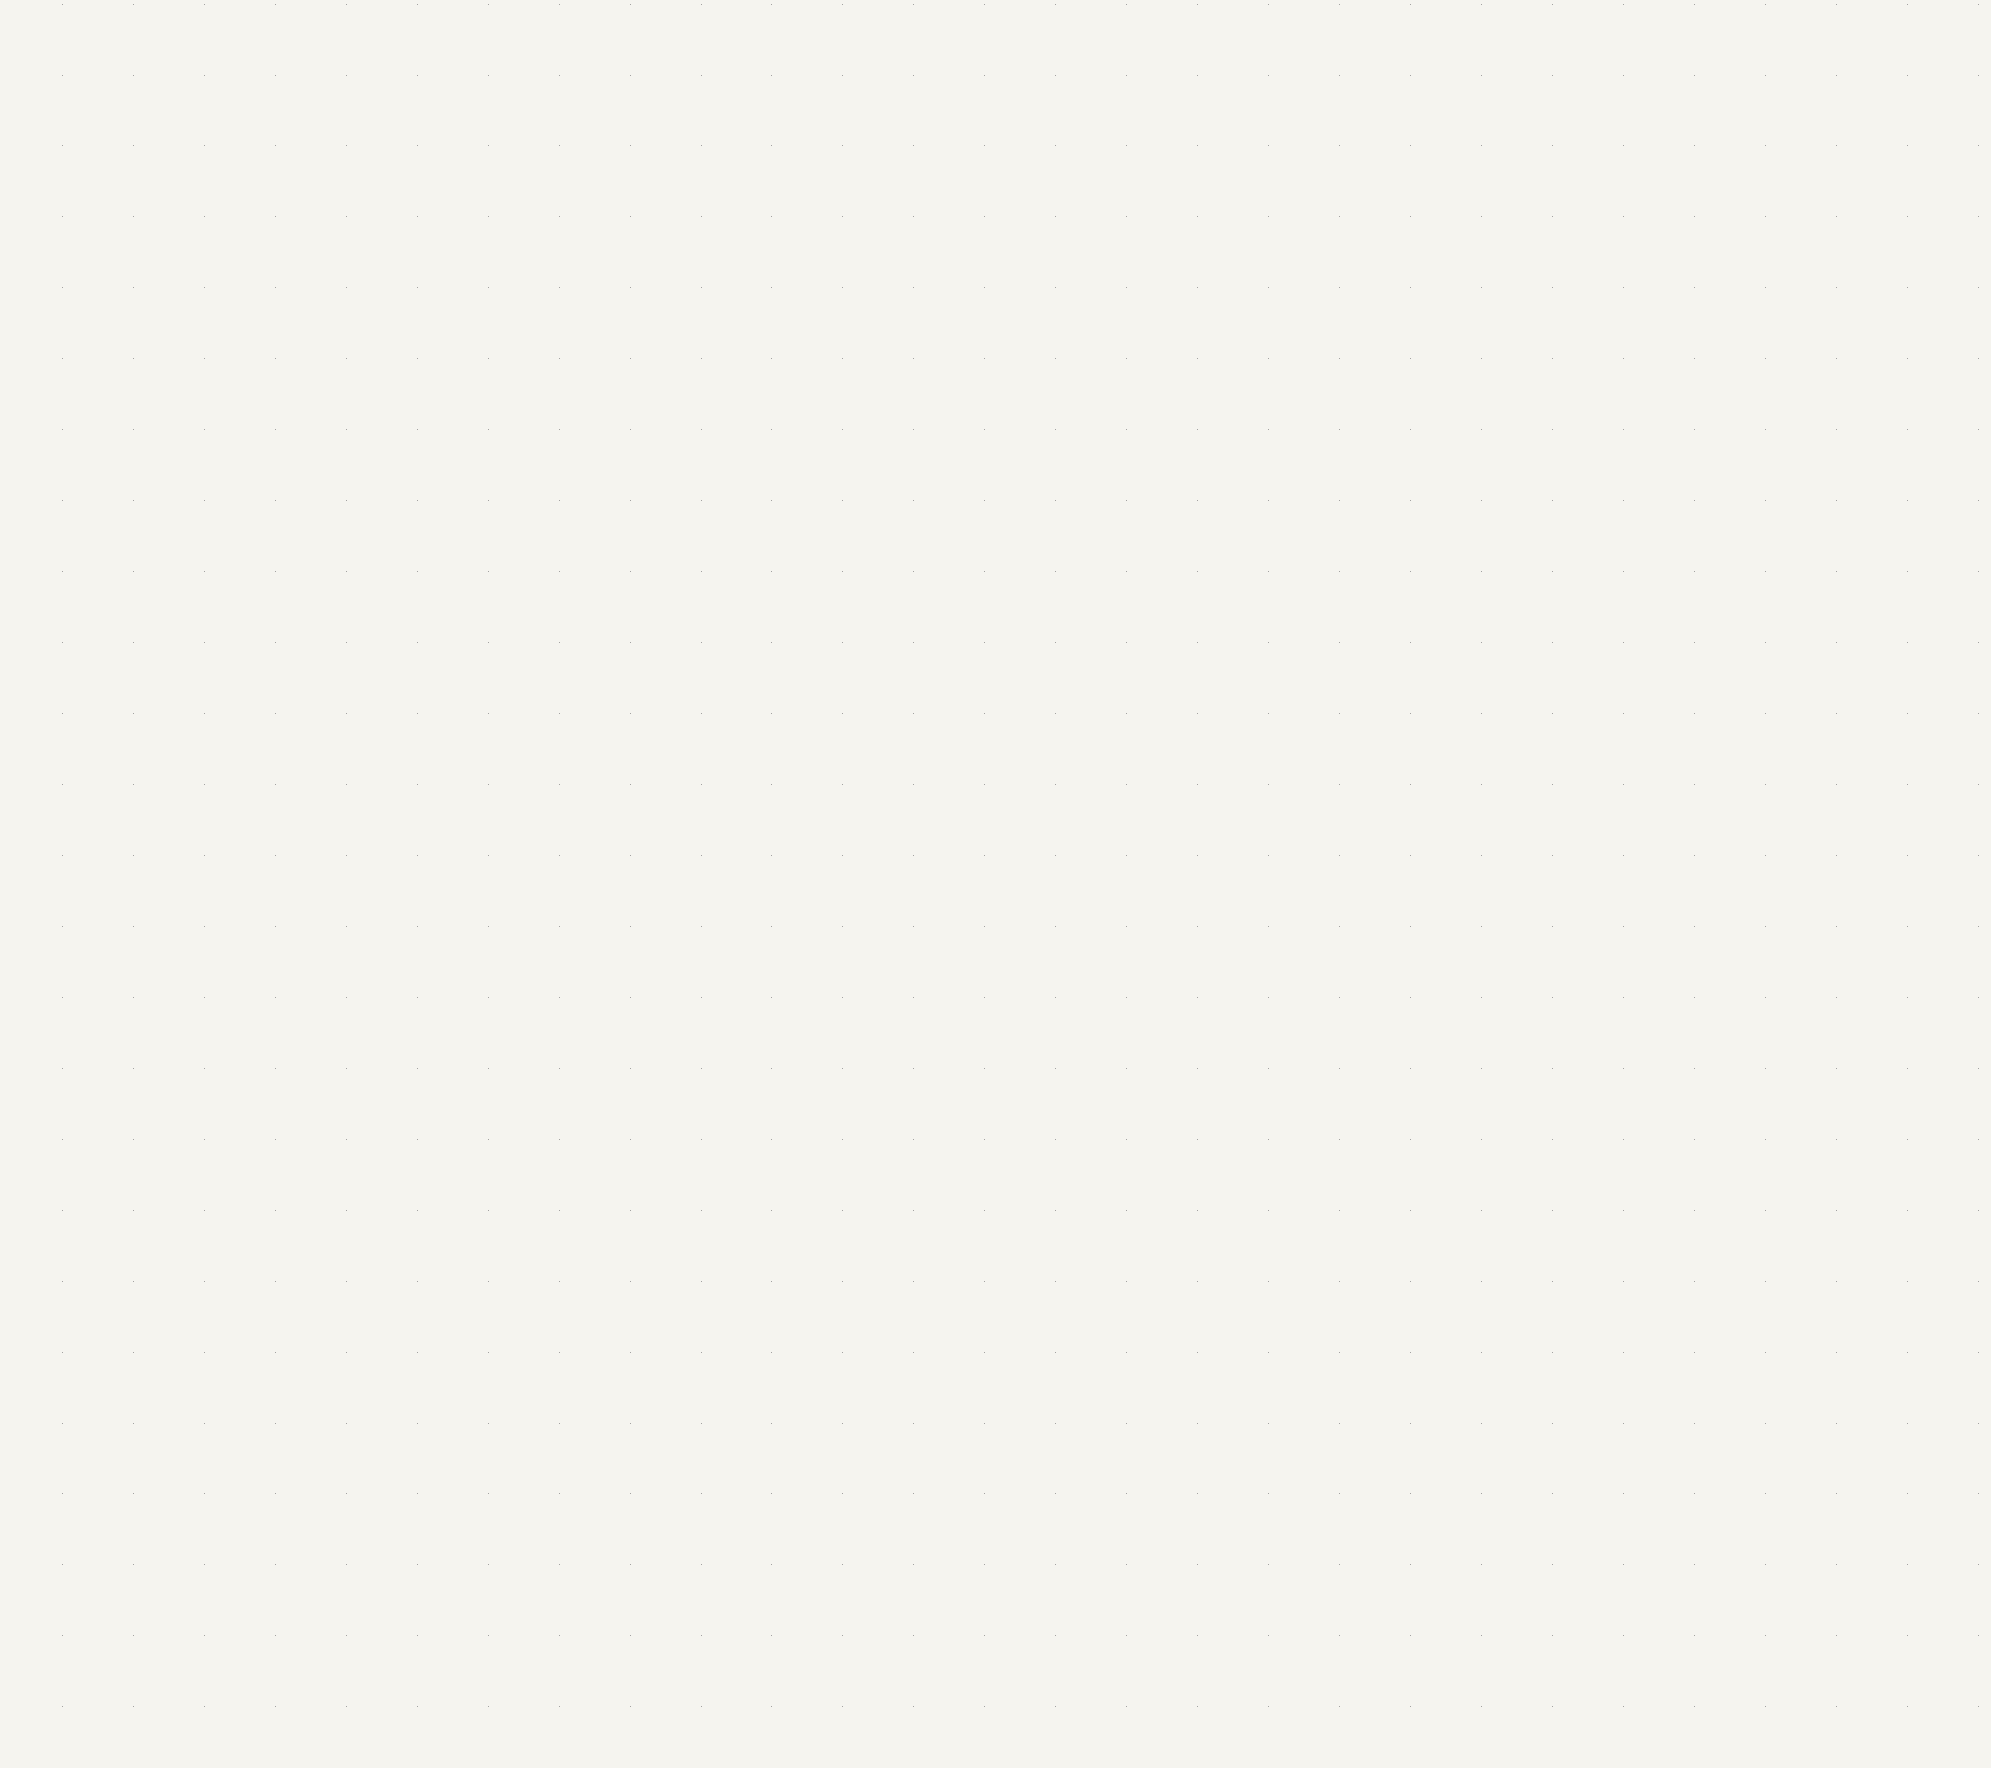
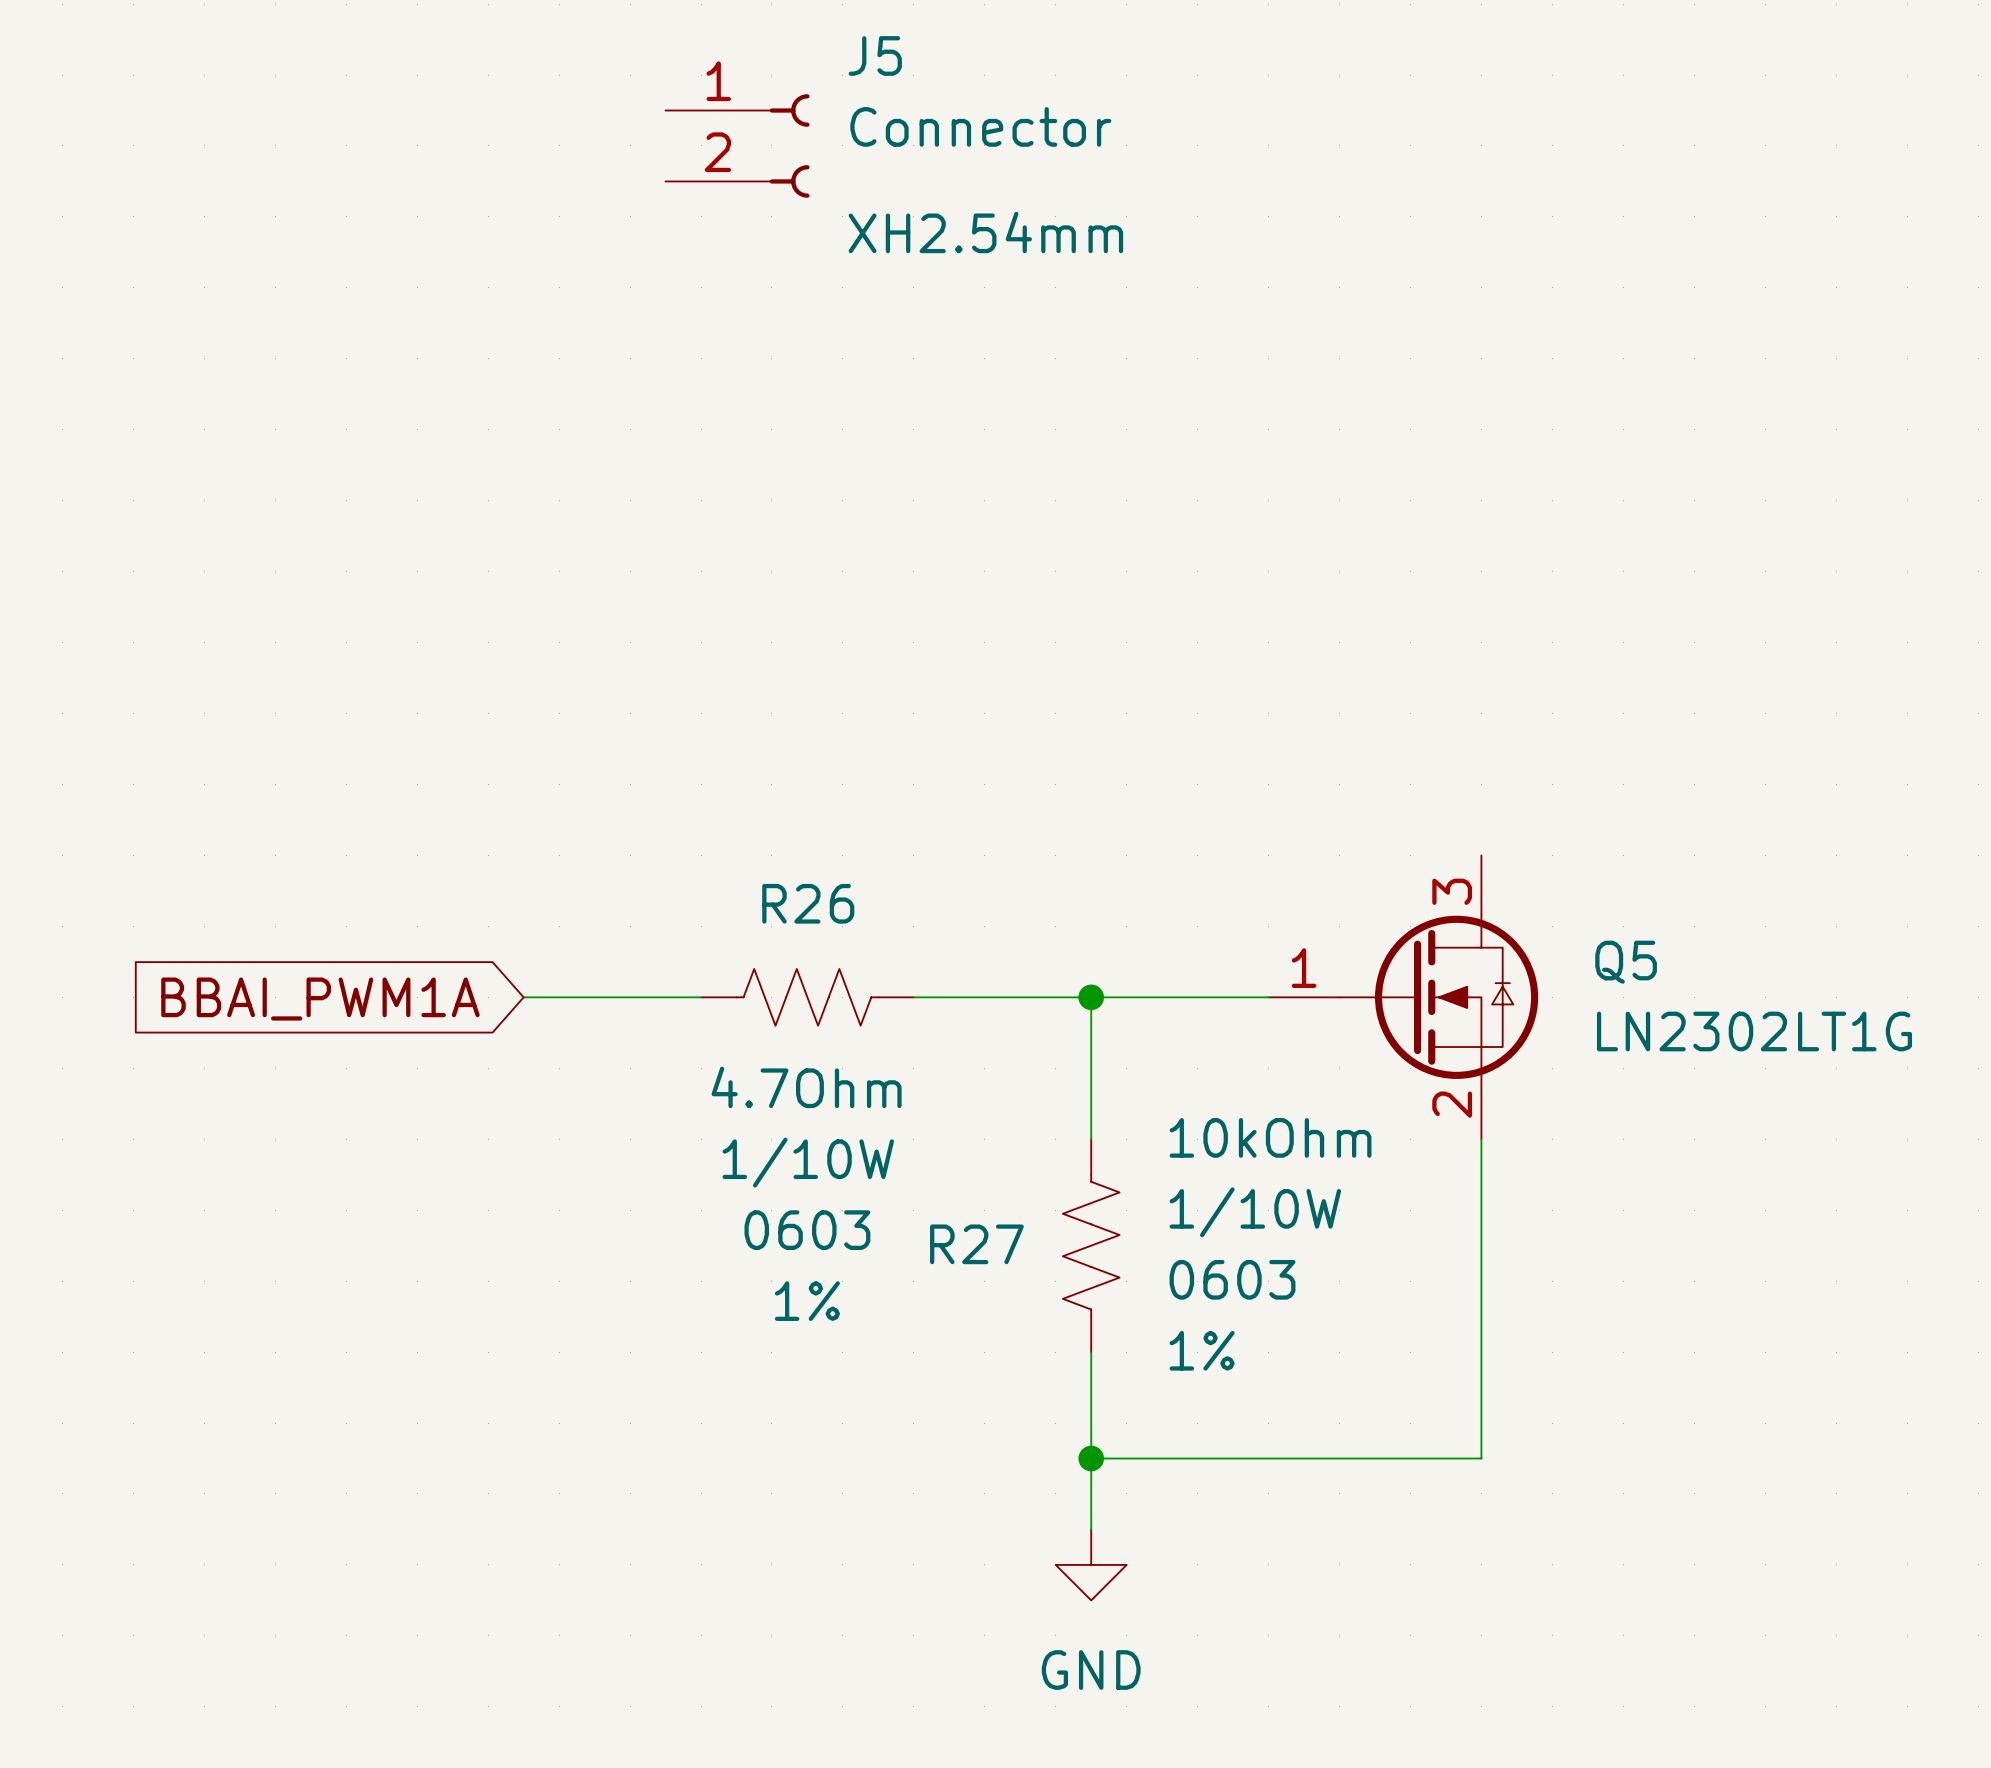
J5: none -> Connector (737, 145)
wire: none -> (523, 997) (701, 997)
R26: none -> 4.7Ohm (807, 997)
wire: none -> (913, 997) (1268, 997)
wire: none -> (1091, 997) (1091, 1139)
junction: none -> (1091, 997)
Q5: none -> LN2302LT1G (1403, 997)
global label: none -> BBAI_PWM1A (320, 999)
wire: none -> (1481, 1139) (1481, 1458) (1091, 1458)
R27: none -> 10kOhm (1091, 1245)
wire: none -> (1091, 1352) (1091, 1529)
junction: none -> (1091, 1458)
power symbol: none -> GND (1091, 1564)

